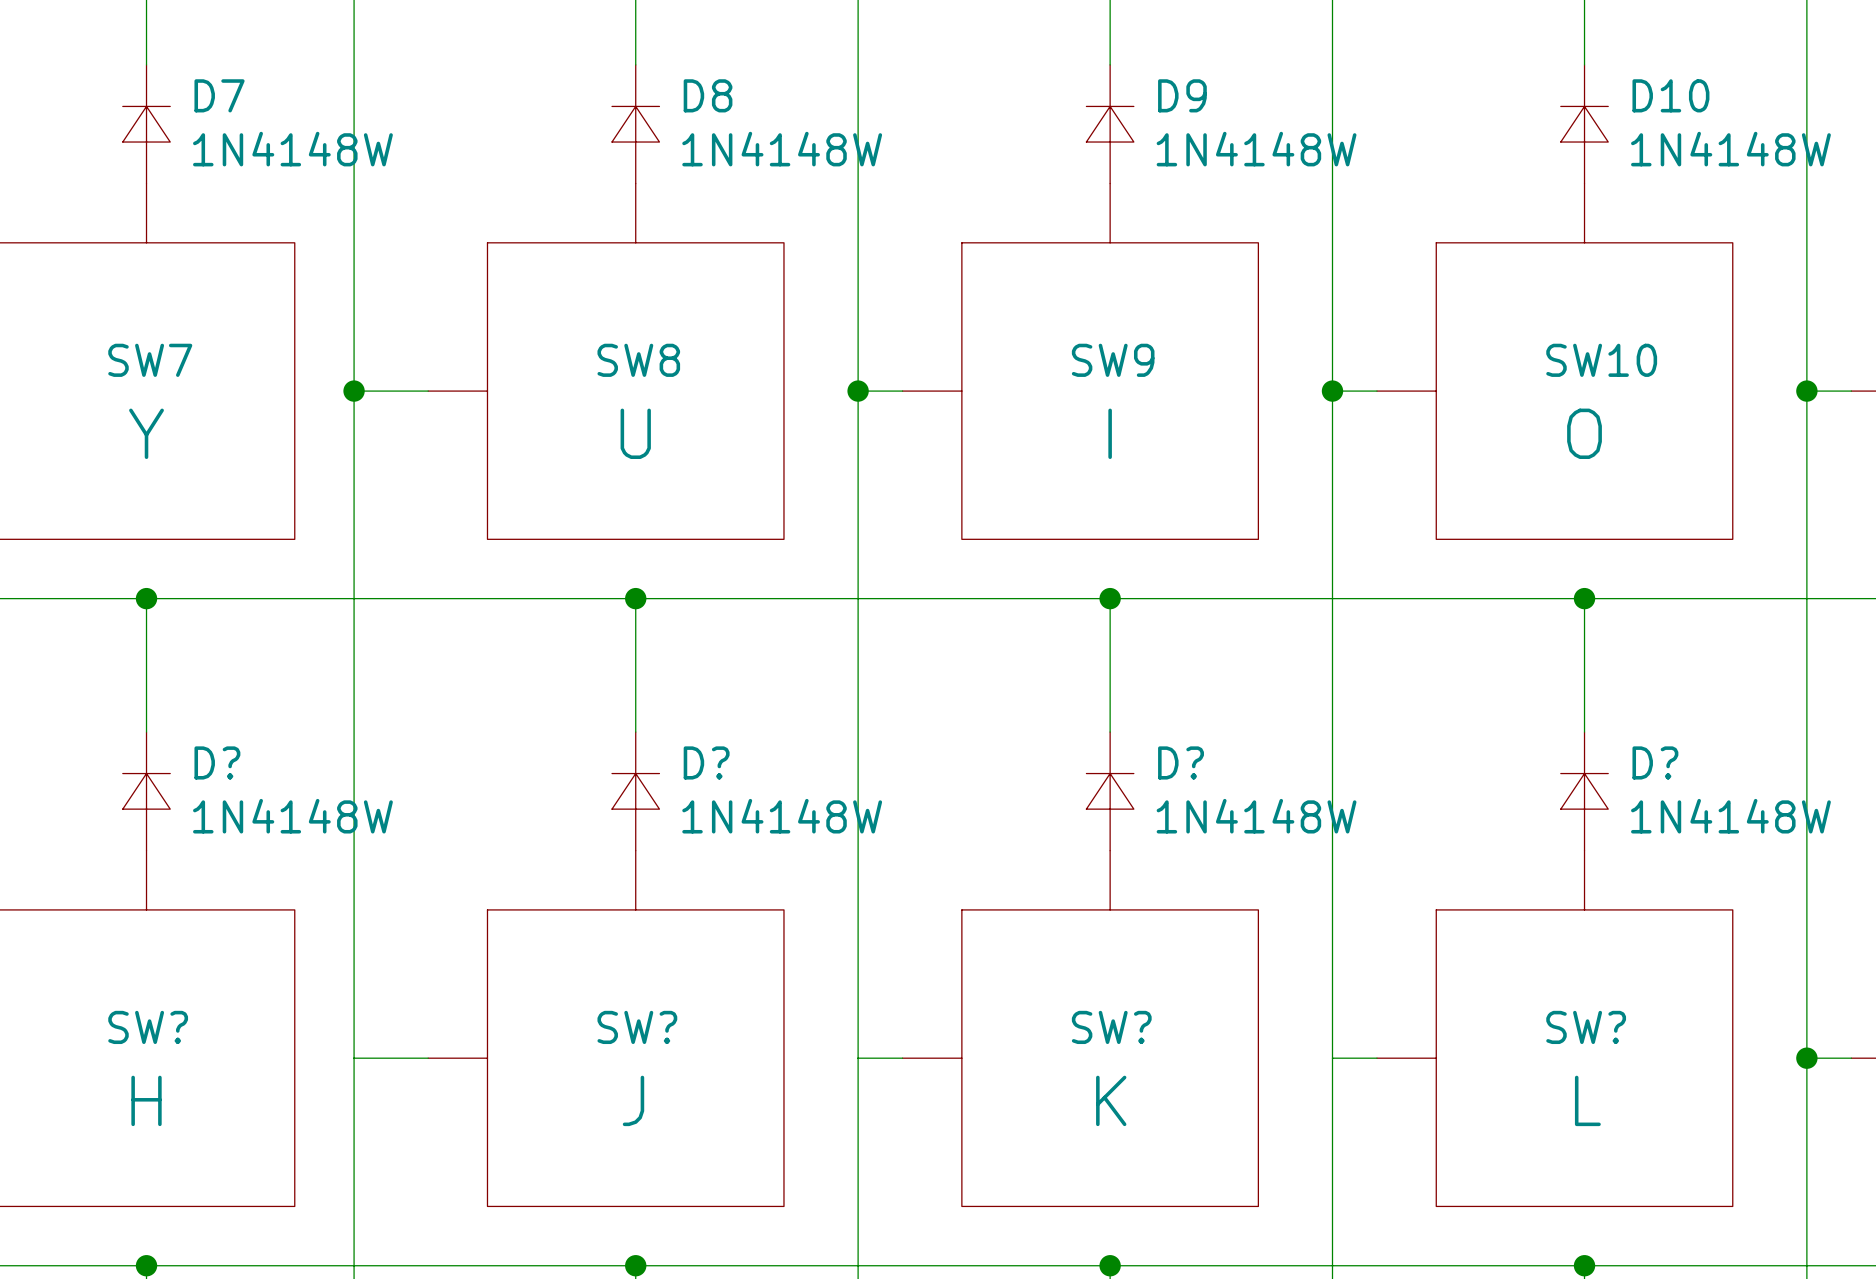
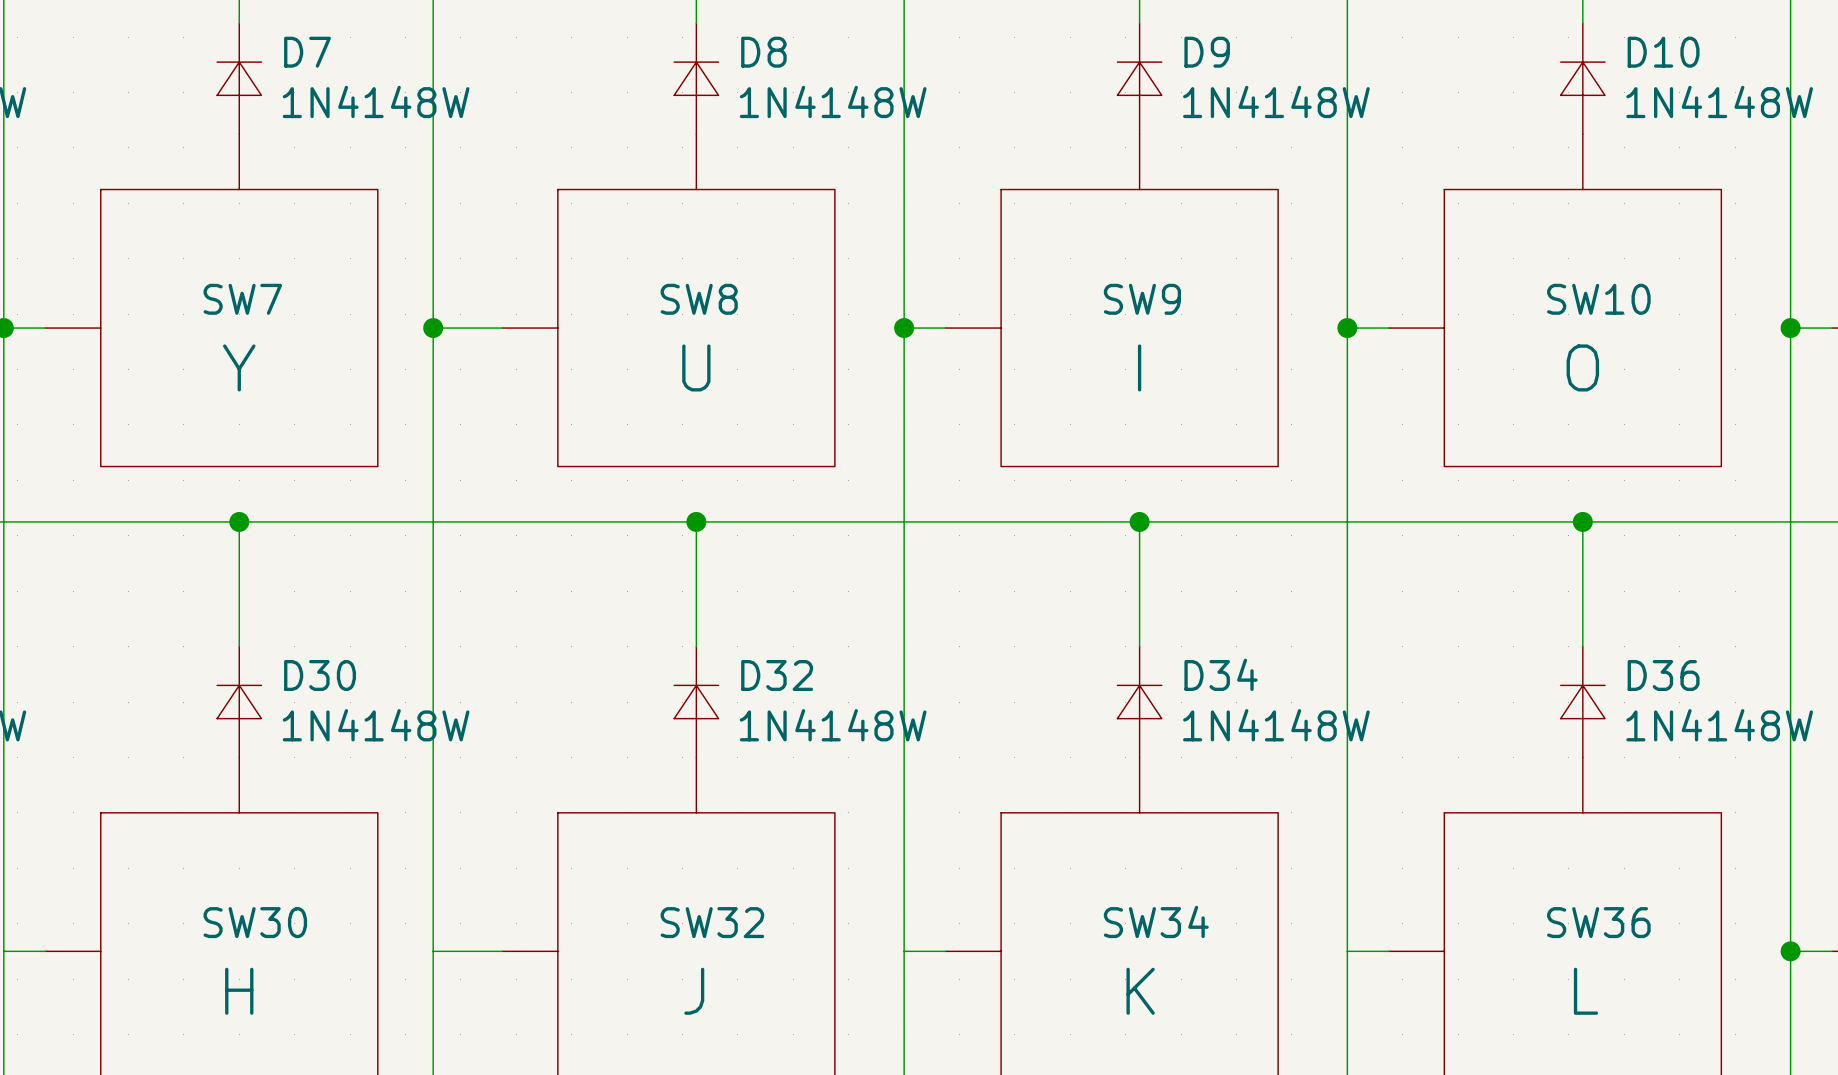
D? name: D? (217, 762) -> D30 (320, 675)
D? name: D? (706, 762) -> D32 (777, 675)
D? name: D? (1181, 762) -> D34 (1221, 674)
D? name: D? (1655, 762) -> D36 (1663, 675)
SW? name: SW? (148, 1027) -> SW30 (255, 922)
SW? name: SW? (637, 1027) -> SW32 (712, 922)
SW? name: SW? (1111, 1027) -> SW34 (1156, 921)
SW? name: SW? (1586, 1027) -> SW36 (1598, 922)

